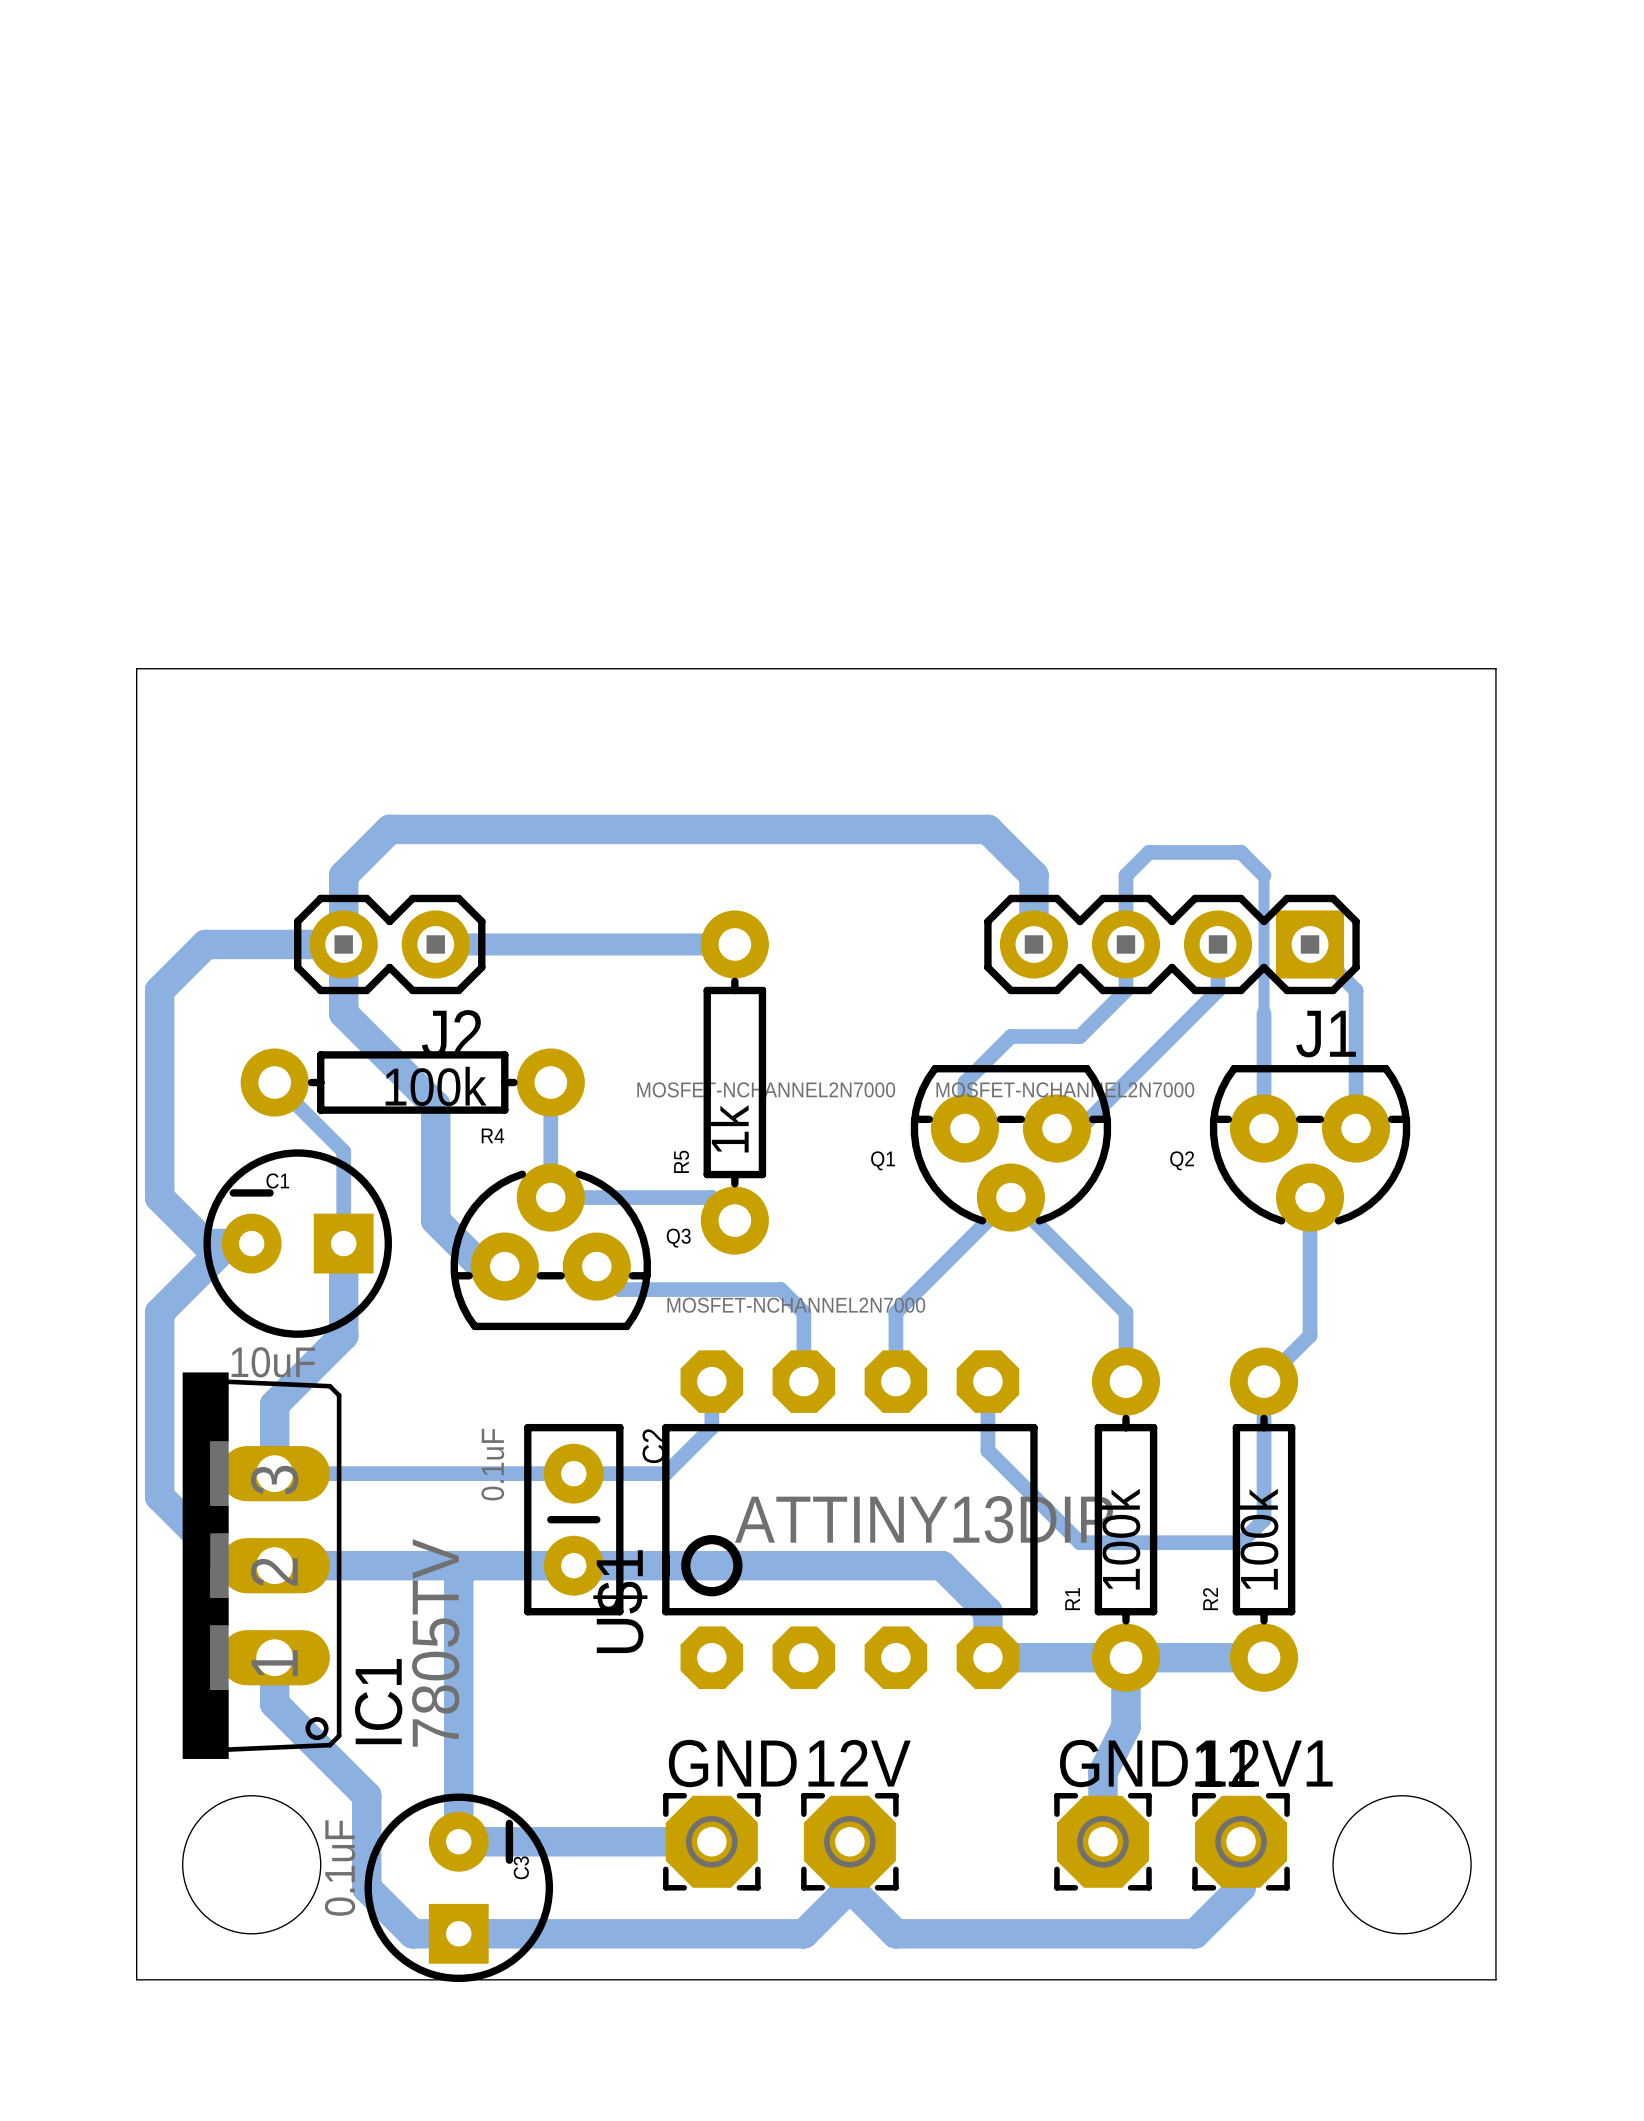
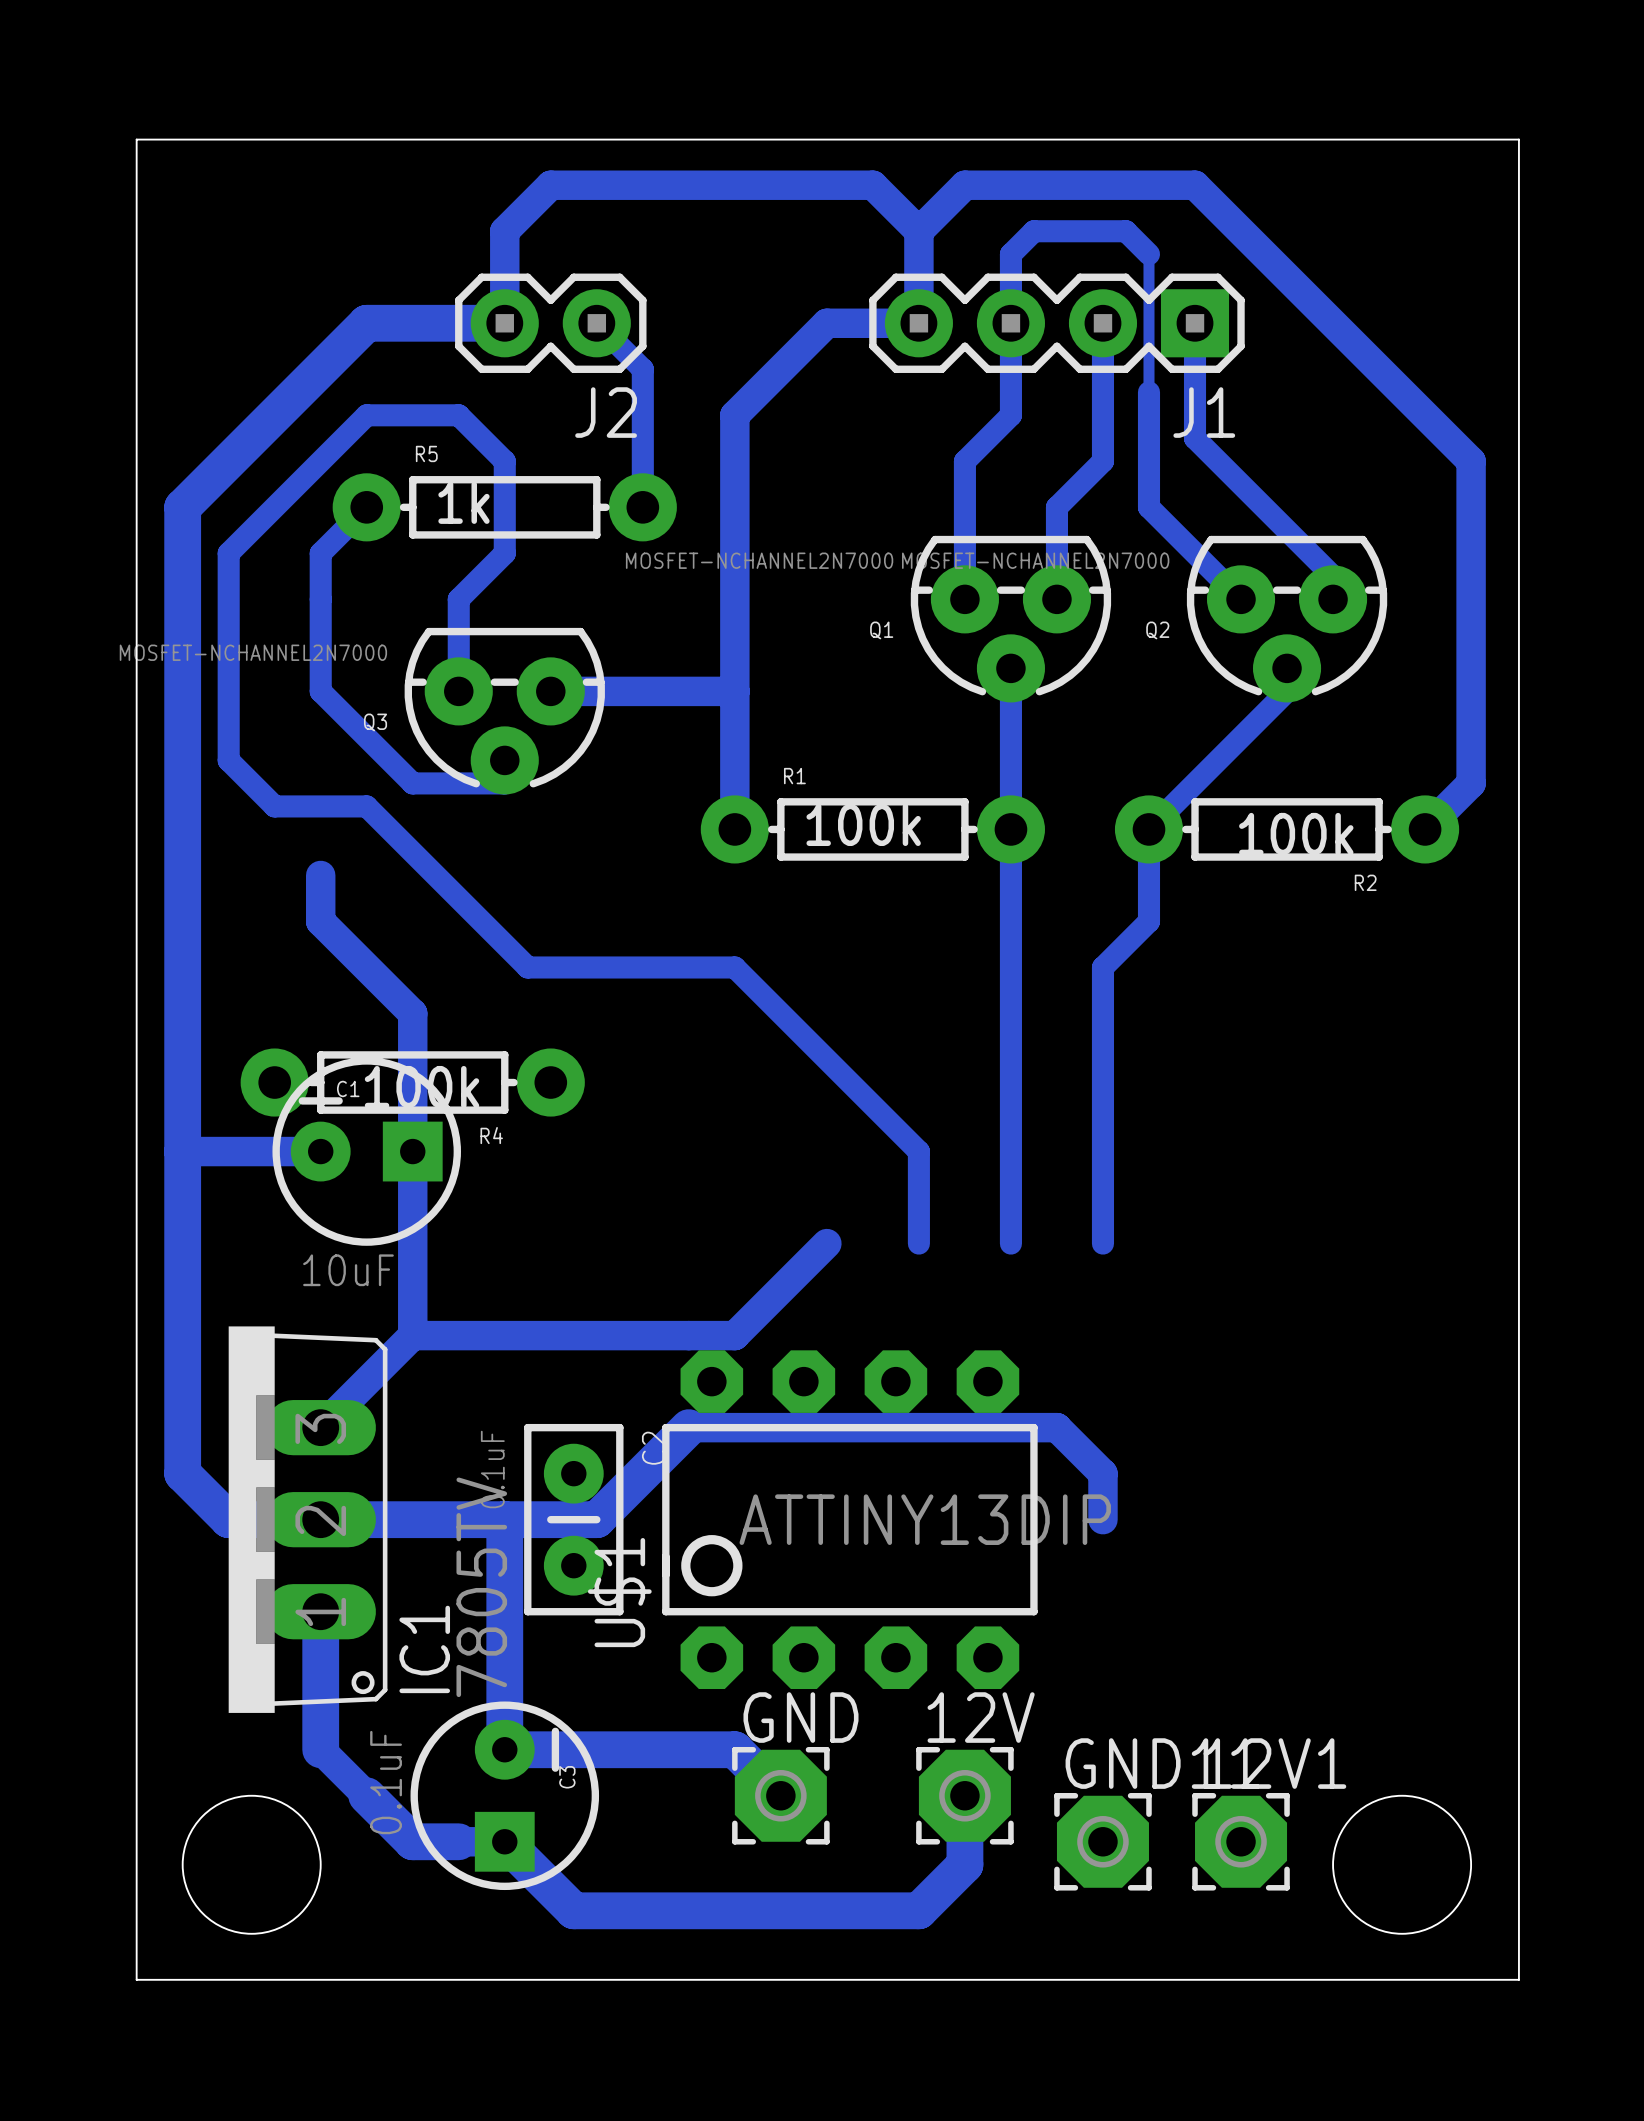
bottom track: none -> (918, 231) (872, 185) (550, 185) (504, 231) (504, 323) (366, 323) (182, 507) (182, 1473) (228, 1519) (596, 1519) (688, 1427) (1056, 1427) (1102, 1473) (1102, 1519)
bottom track: none -> (918, 231) (918, 323) (826, 323) (734, 415) (734, 829)
bottom track: none -> (918, 231) (964, 185) (1195, 185) (1471, 461) (1471, 783) (1425, 829)
bottom track: none -> (596, 323) (642, 369) (642, 507)
bottom track: none -> (1102, 323) (1102, 461) (1056, 507) (1056, 599)
bottom track: none -> (1195, 323) (1195, 438) (1333, 576) (1333, 599)
bottom track: none -> (366, 507) (320, 553) (320, 691) (412, 783) (504, 783) (504, 760)
bottom track: none -> (964, 599) (964, 461) (1010, 415) (1010, 254) (1033, 231) (1125, 231) (1148, 254) (1148, 507) (1241, 599)
board edge: (136, 668) (1495, 668) (1495, 1979) -> (136, 668) (136, 139) (1518, 139) (1518, 1979) (1495, 1979)
bottom track: none -> (1010, 668) (1010, 1243)
bottom track: none -> (1287, 668) (1287, 691) (1148, 829) (1148, 921) (1102, 967) (1102, 1243)
bottom track: none -> (458, 691) (458, 599) (504, 553) (504, 461) (458, 415) (366, 415) (228, 553) (228, 760) (274, 806) (366, 806) (527, 967) (734, 967) (918, 1151) (918, 1243)
bottom track: none -> (550, 691) (734, 691)
bottom track: none -> (320, 875) (320, 921) (412, 1013) (412, 1335)
bottom track: (343, 944) (205, 944) (159, 990) (159, 1197) (205, 1243) (251, 1243) -> none
J2 position: (389, 944) -> (550, 323)
bottom track: (435, 944) (734, 944) -> none
bottom track: (1033, 944) (1033, 875) (987, 829) (389, 829) (343, 875) (343, 1013) (435, 1105) (435, 1220) (481, 1266) (504, 1266) -> none
J1 position: (1172, 944) -> (1056, 323)
bottom track: (1218, 944) (1218, 990) (1079, 1128) (1056, 1128) -> none
bottom track: (1310, 944) (1356, 990) (1356, 1128) -> none
Q2 footprint: [1209, 1065, 1411, 1232] -> [1186, 535, 1388, 703]
bottom track: (274, 1082) (343, 1151) (343, 1335) (274, 1404) (274, 1473) (665, 1473) (711, 1427) (711, 1381) -> none
bottom track: (550, 1082) (550, 1197) (711, 1197) (734, 1220) -> none
R5 rotation: 0° (734, 1082) -> 90° clockwise (504, 507)
R5 position: (734, 1082) -> (504, 507)
bottom track: (964, 1128) (964, 1082) (1010, 1036) (1079, 1036) (1125, 990) (1125, 875) (1148, 852) (1241, 852) (1264, 875) (1264, 1128) -> none
Q1 position: (1010, 1148) -> (1010, 619)
bottom track: none -> (182, 1151) (320, 1151)
bottom track: (1310, 1197) (1310, 1335) (1264, 1381) (1264, 1519) (1241, 1542) (1079, 1542) (987, 1450) (987, 1381) -> none
bottom track: (228, 1243) (159, 1312) (159, 1496) (228, 1565) (941, 1565) (987, 1611) (987, 1657) (1264, 1657) -> none
C1 position: (297, 1243) -> (366, 1151)
bottom track: none -> (826, 1243) (734, 1335) (412, 1335)
Q3 rotation: 0° (550, 1246) -> 180° (504, 711)
Q3 position: (550, 1246) -> (504, 711)
bottom track: (596, 1266) (619, 1289) (780, 1289) (803, 1312) (803, 1381) -> none
bottom track: none -> (412, 1335) (320, 1427)
bottom track: (895, 1381) (895, 1312) (1010, 1197) (1125, 1312) (1125, 1381) -> none
bottom track: none -> (504, 1519) (504, 1749) (734, 1749) (780, 1795)
R1 rotation: 0° (1125, 1519) -> 90° clockwise (872, 829)
R1 position: (1125, 1519) -> (872, 829)
R2 rotation: 0° (1264, 1519) -> 90° clockwise (1287, 829)
R2 position: (1264, 1519) -> (1287, 829)
IC1 position: (262, 1565) -> (308, 1519)
bottom track: (458, 1565) (458, 1841) -> (366, 1795) (412, 1841) (458, 1841)
R2 name position: R2 (1210, 1599) -> R2 (1365, 882)
bottom track: (274, 1657) (274, 1703) (320, 1749) -> (320, 1611) (320, 1749)
bottom track: (1125, 1657) (1125, 1726) (1102, 1772) (1102, 1841) -> none
bottom track: (366, 1795) (366, 1887) (412, 1933) (803, 1933) (849, 1887) -> none
bottom track: (504, 1841) (711, 1841) -> (504, 1841) (573, 1910) (918, 1910) (964, 1864) (964, 1795)
GND position: (711, 1841) -> (780, 1795)
12V position: (849, 1841) -> (964, 1795)
bottom track: (1241, 1841) (1241, 1887) (1195, 1933) (895, 1933) (849, 1887) -> none
C3 position: (458, 1887) -> (504, 1795)

